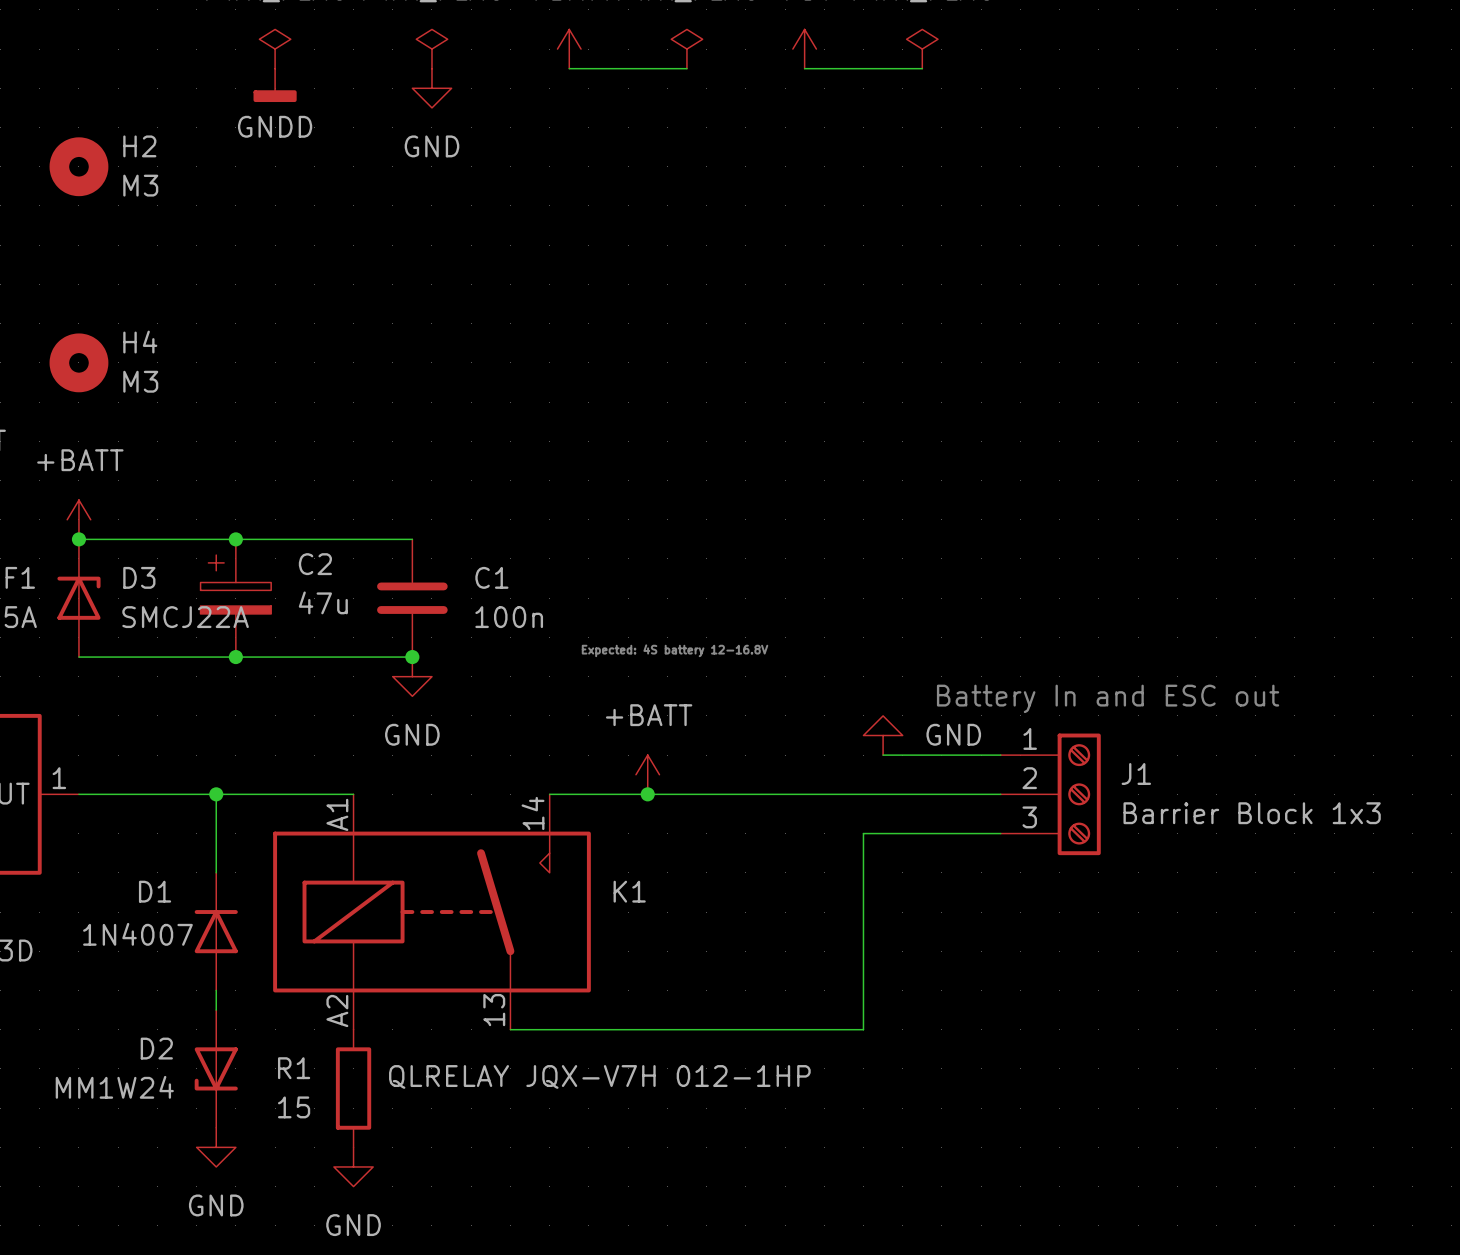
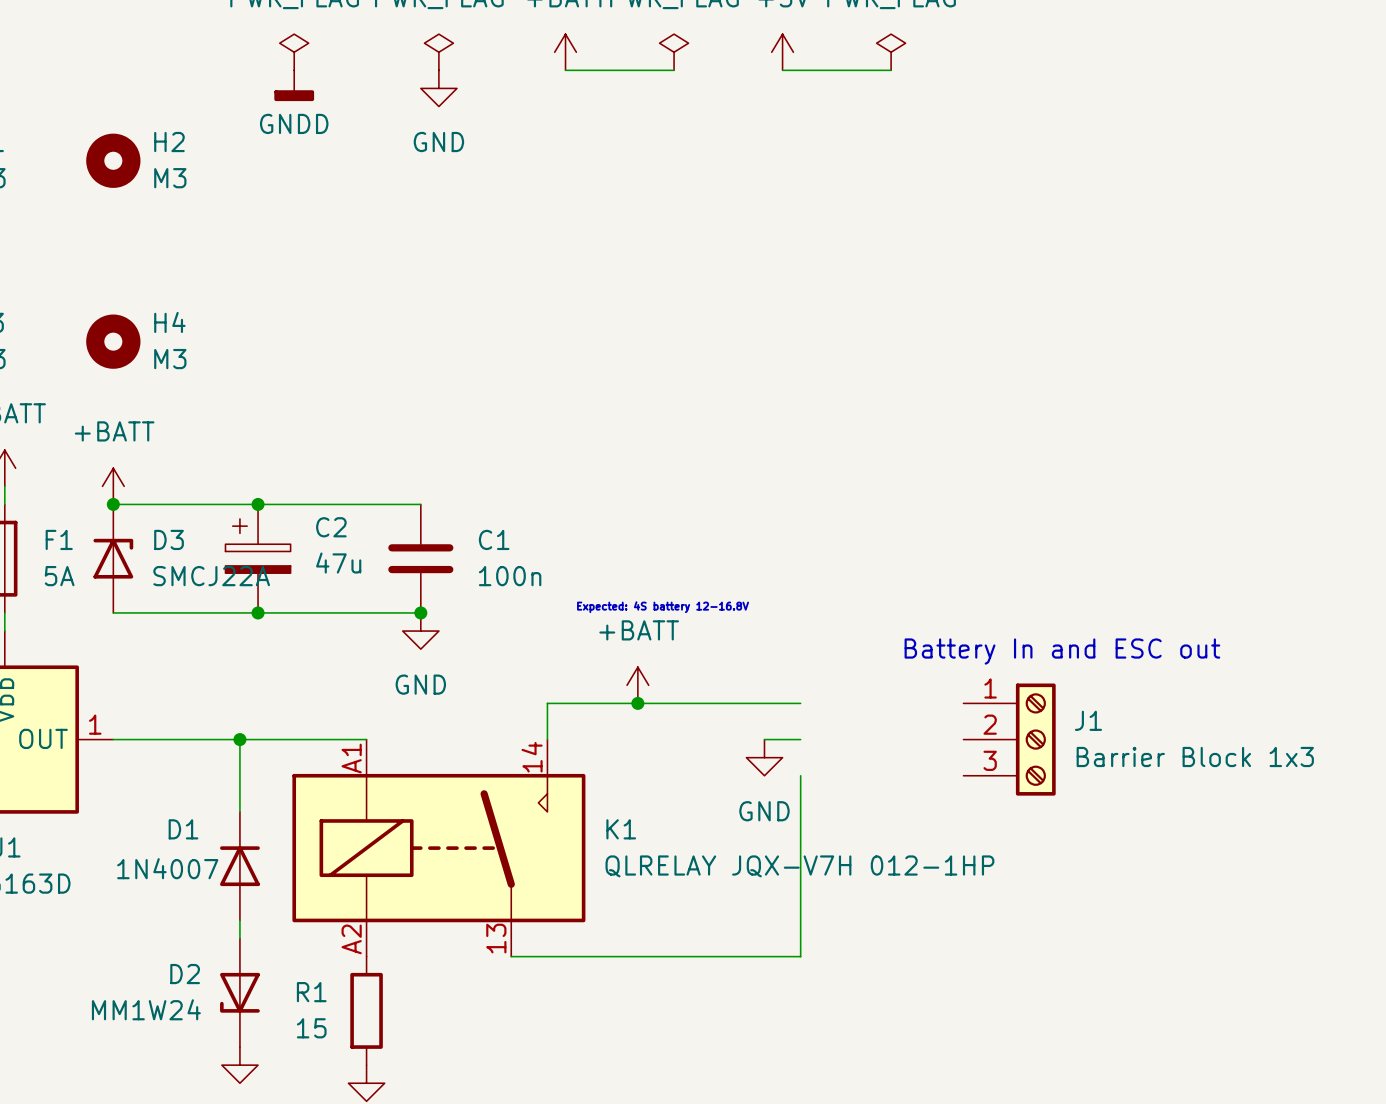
power symbol text position: GND (953, 734) -> GND (764, 811)
power symbol rotation: 0° (883, 735) -> 180° (764, 757)
power symbol position: GND (883, 735) -> GND (764, 757)
wire: (883, 755) (1000, 755) -> none
power symbol position: +BATT (647, 774) -> +BATT (637, 685)
wire: (549, 794) (785, 794) -> (547, 739) (547, 703) (800, 703)
junction position: (647, 794) -> (637, 703)
wire: (824, 794) (1000, 794) -> none
wire: (1000, 833) (863, 833) (863, 1029) (824, 1029) -> (800, 775) (800, 956)
K1 value position: QLRELAY JQX-V7H 012-1HP (599, 1076) -> QLRELAY JQX-V7H 012-1HP (799, 866)

